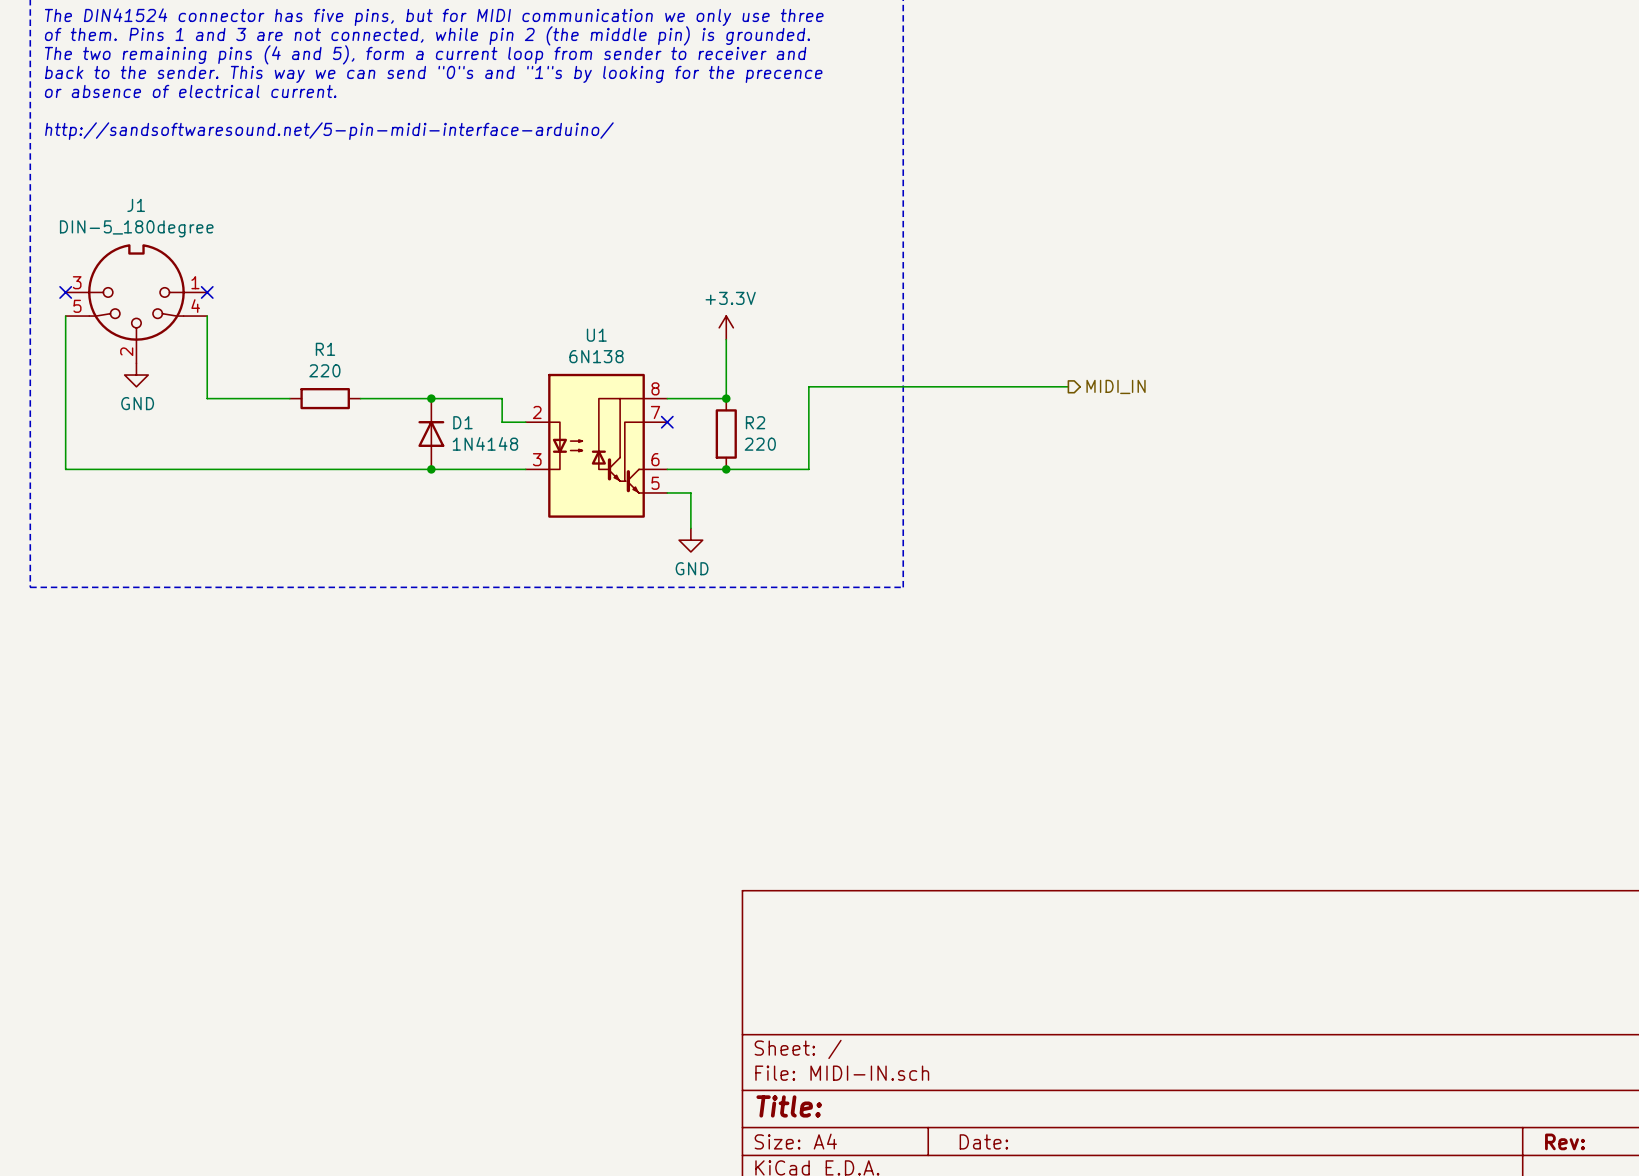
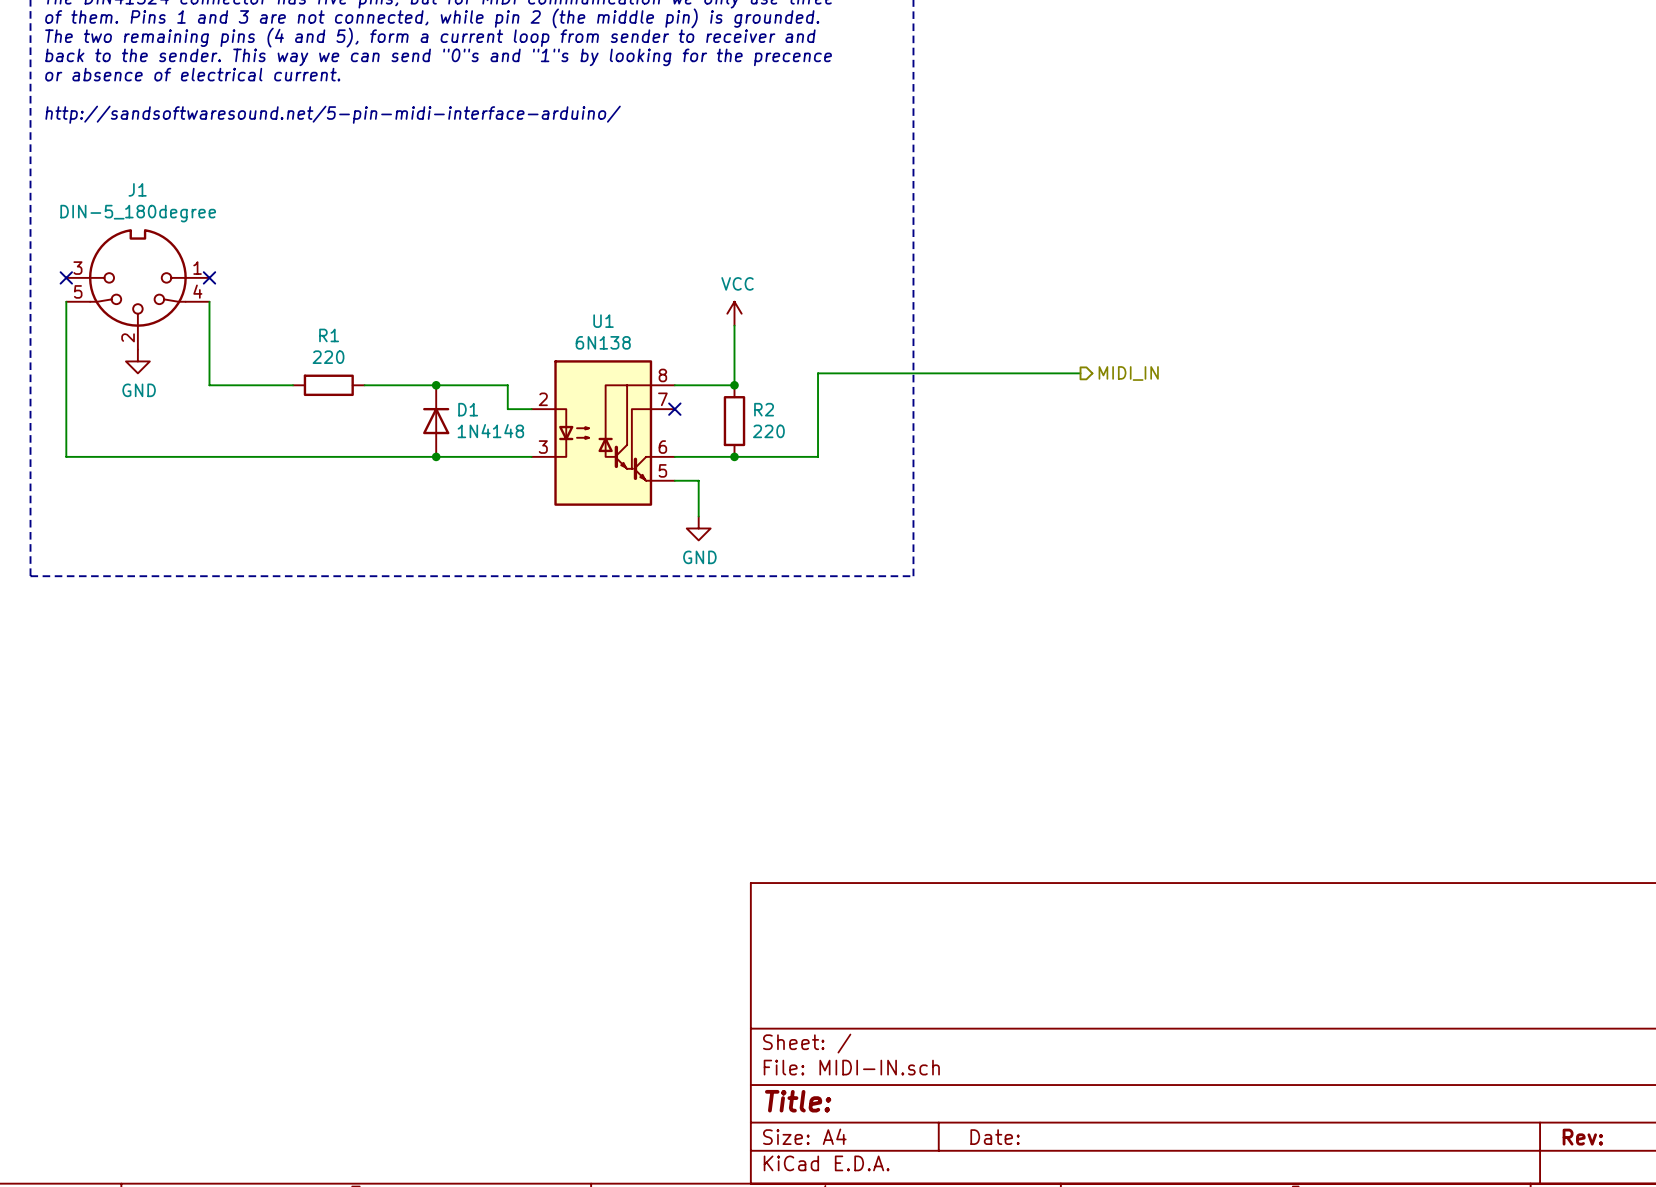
power symbol: +3.3V (726, 327) -> VCC (734, 313)

